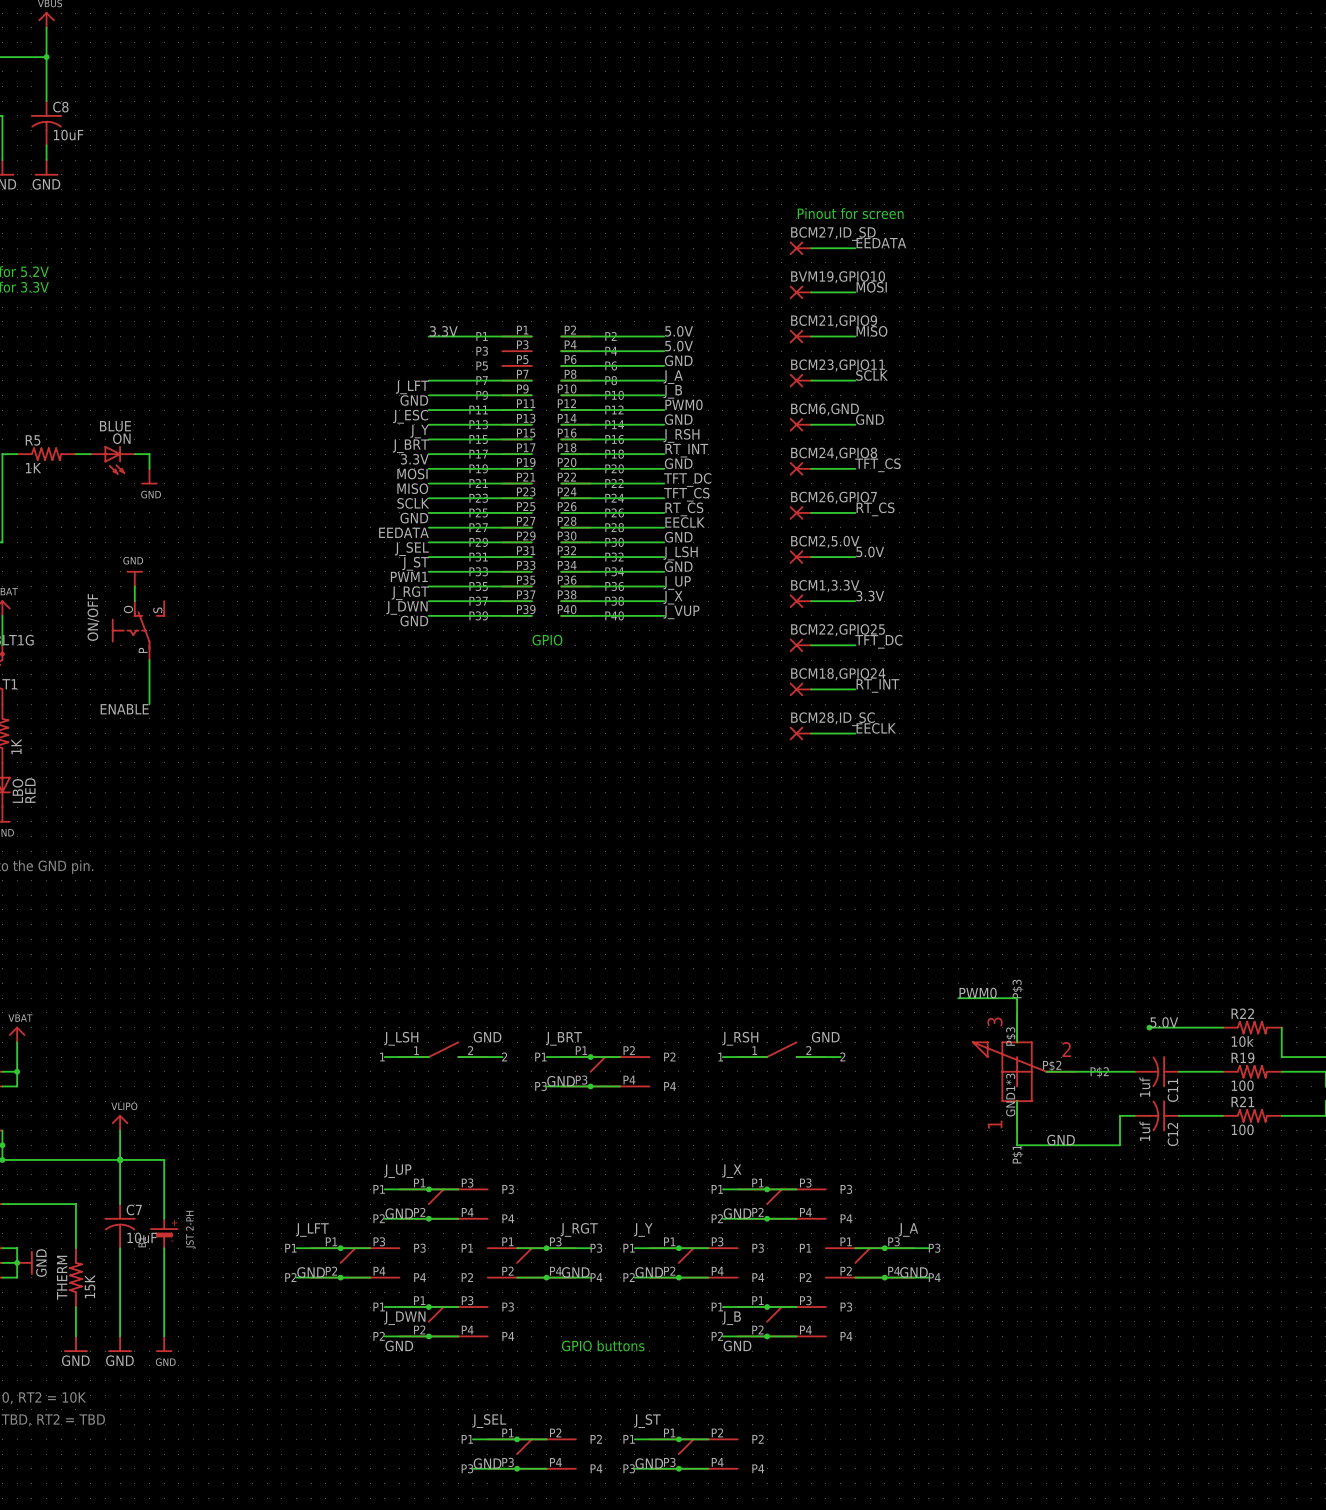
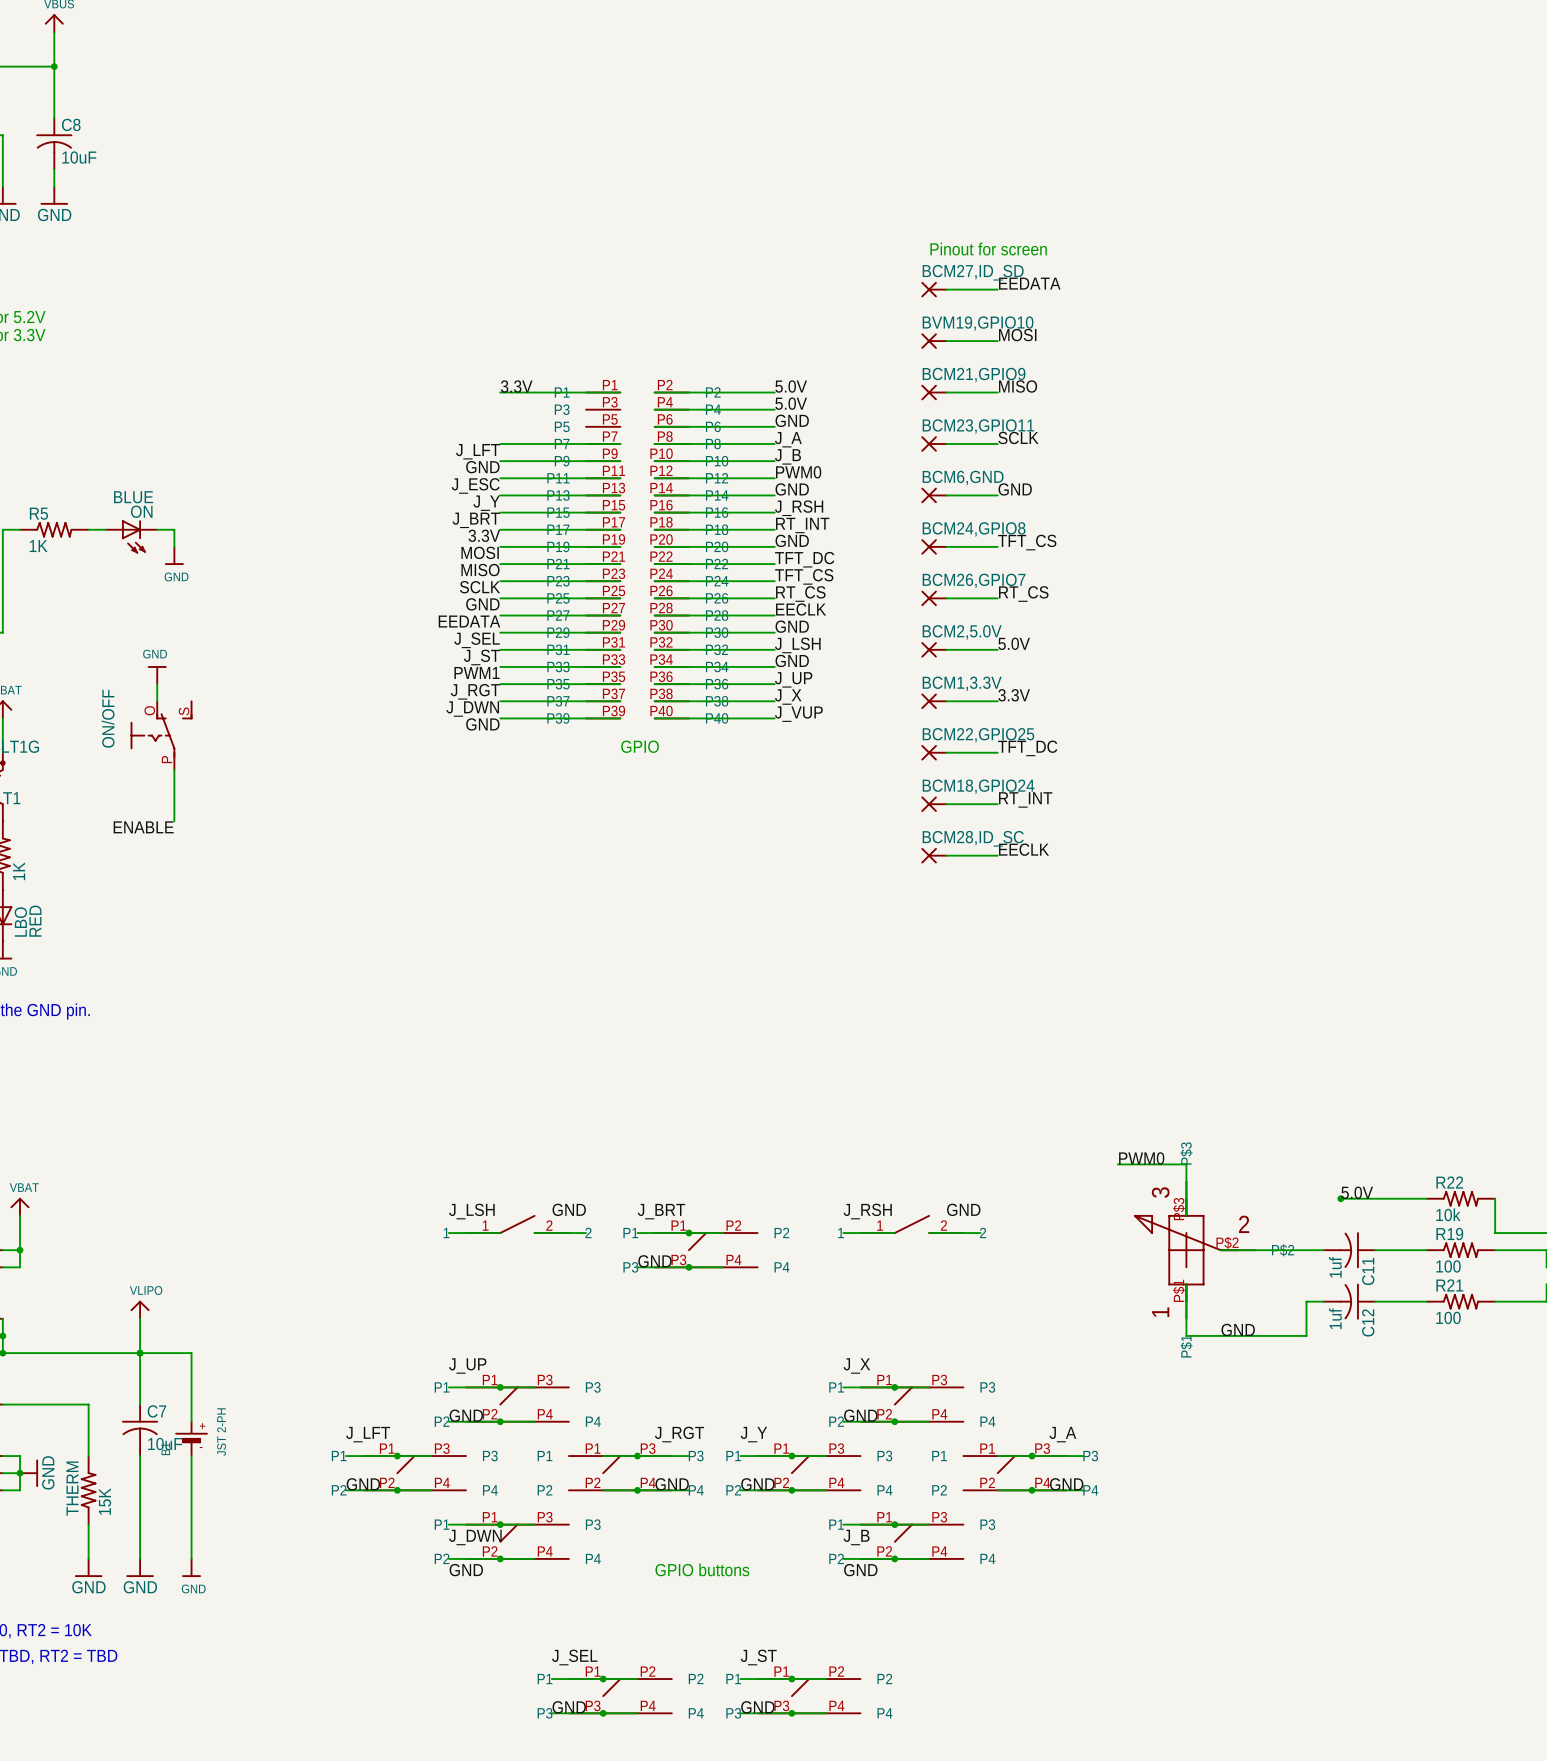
part pin number: GND1*3 (1010, 1095) -> P$1 (1179, 1290)

